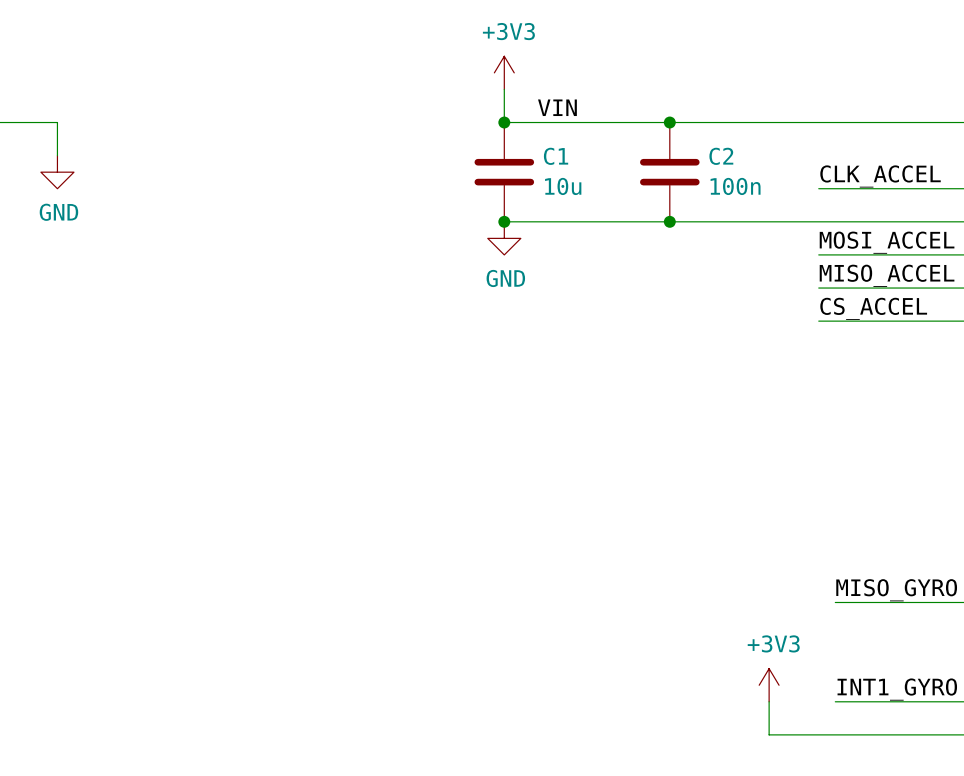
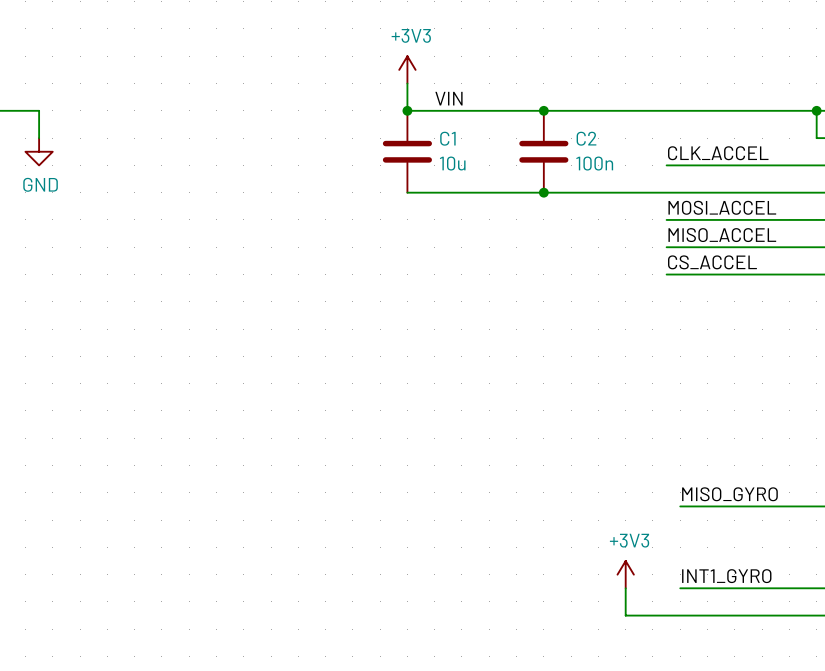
junction: (504, 221) -> none
power symbol: GND (504, 238) -> none

